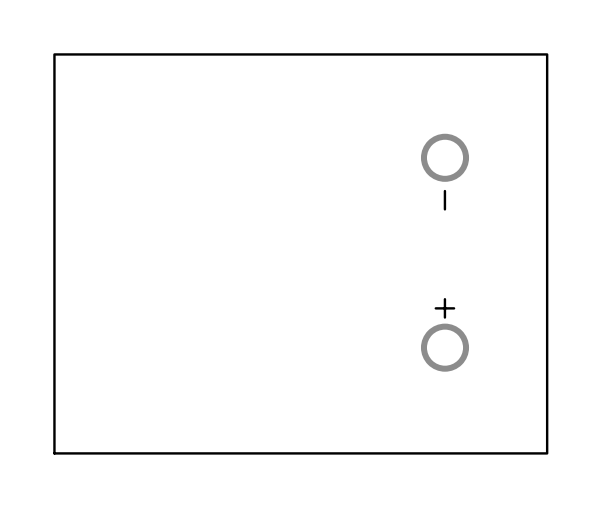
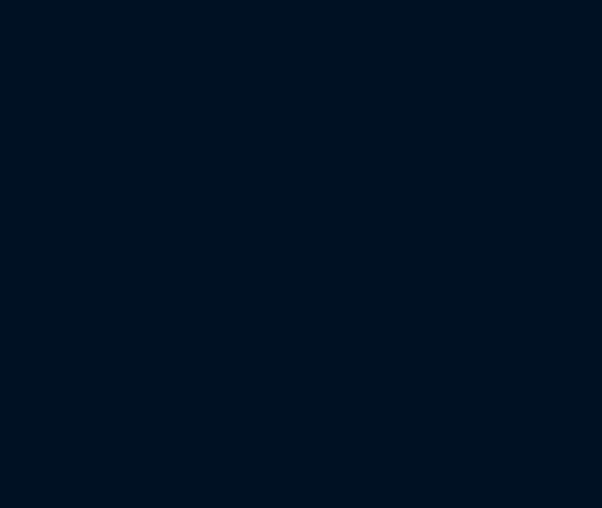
part: (300, 253) -> none

